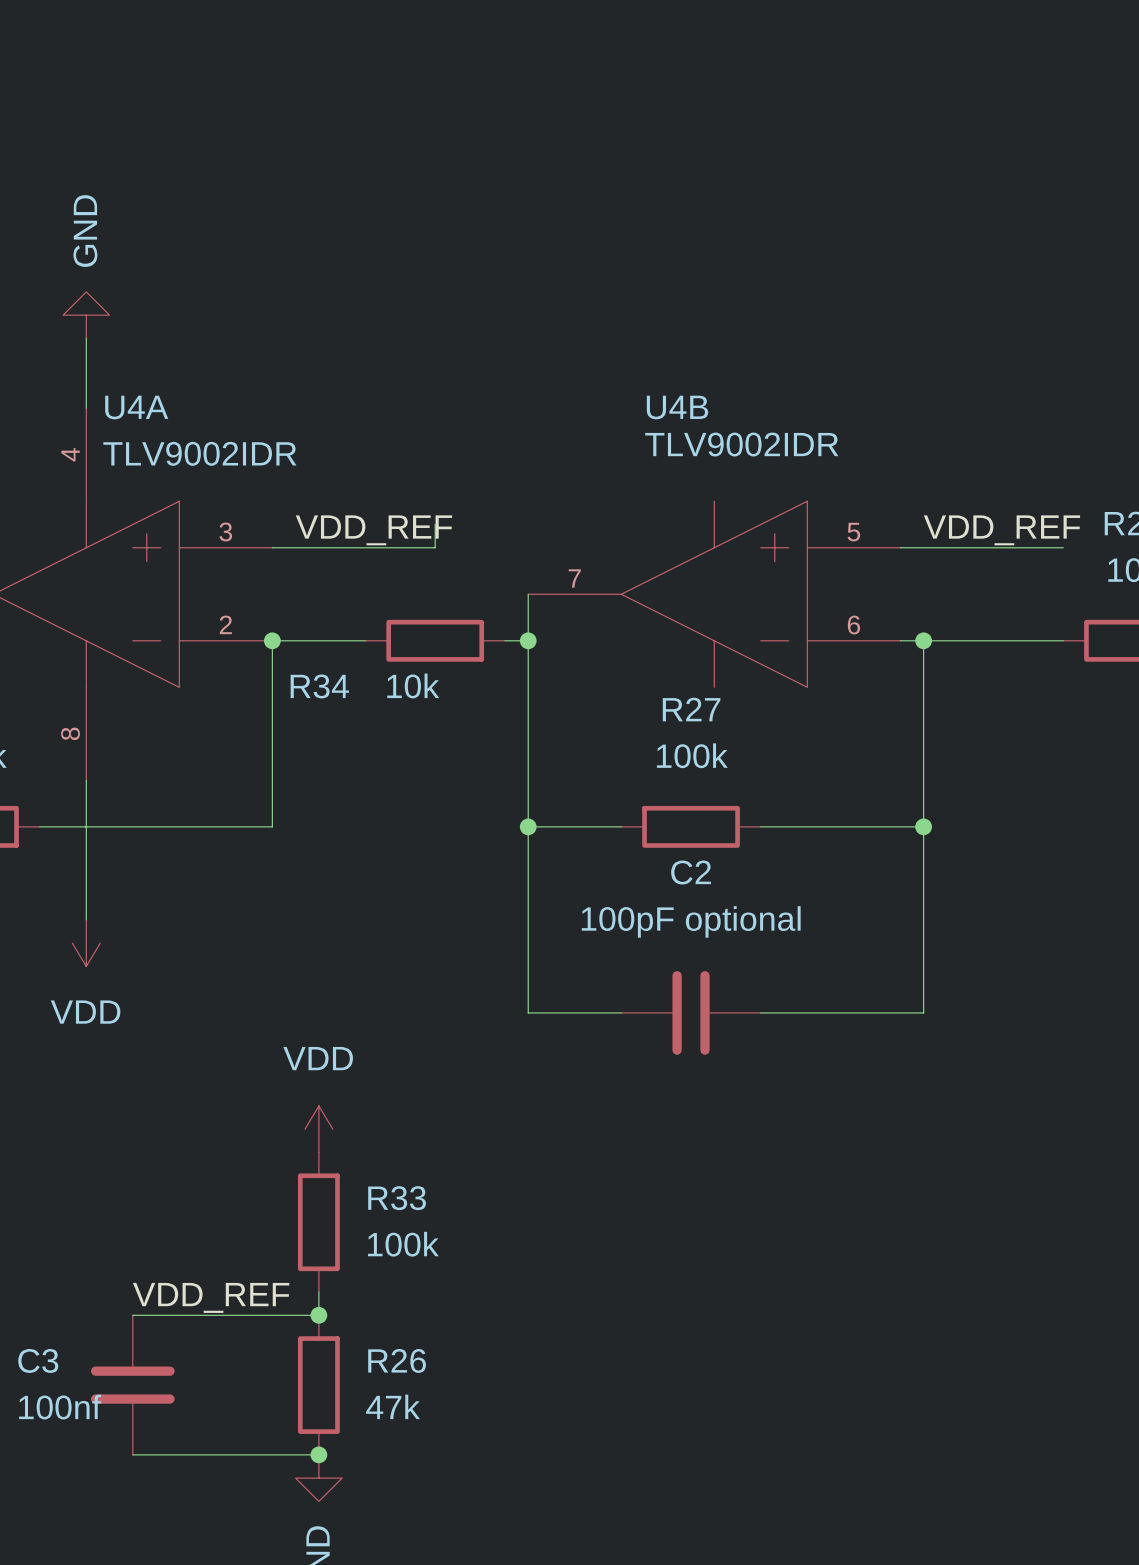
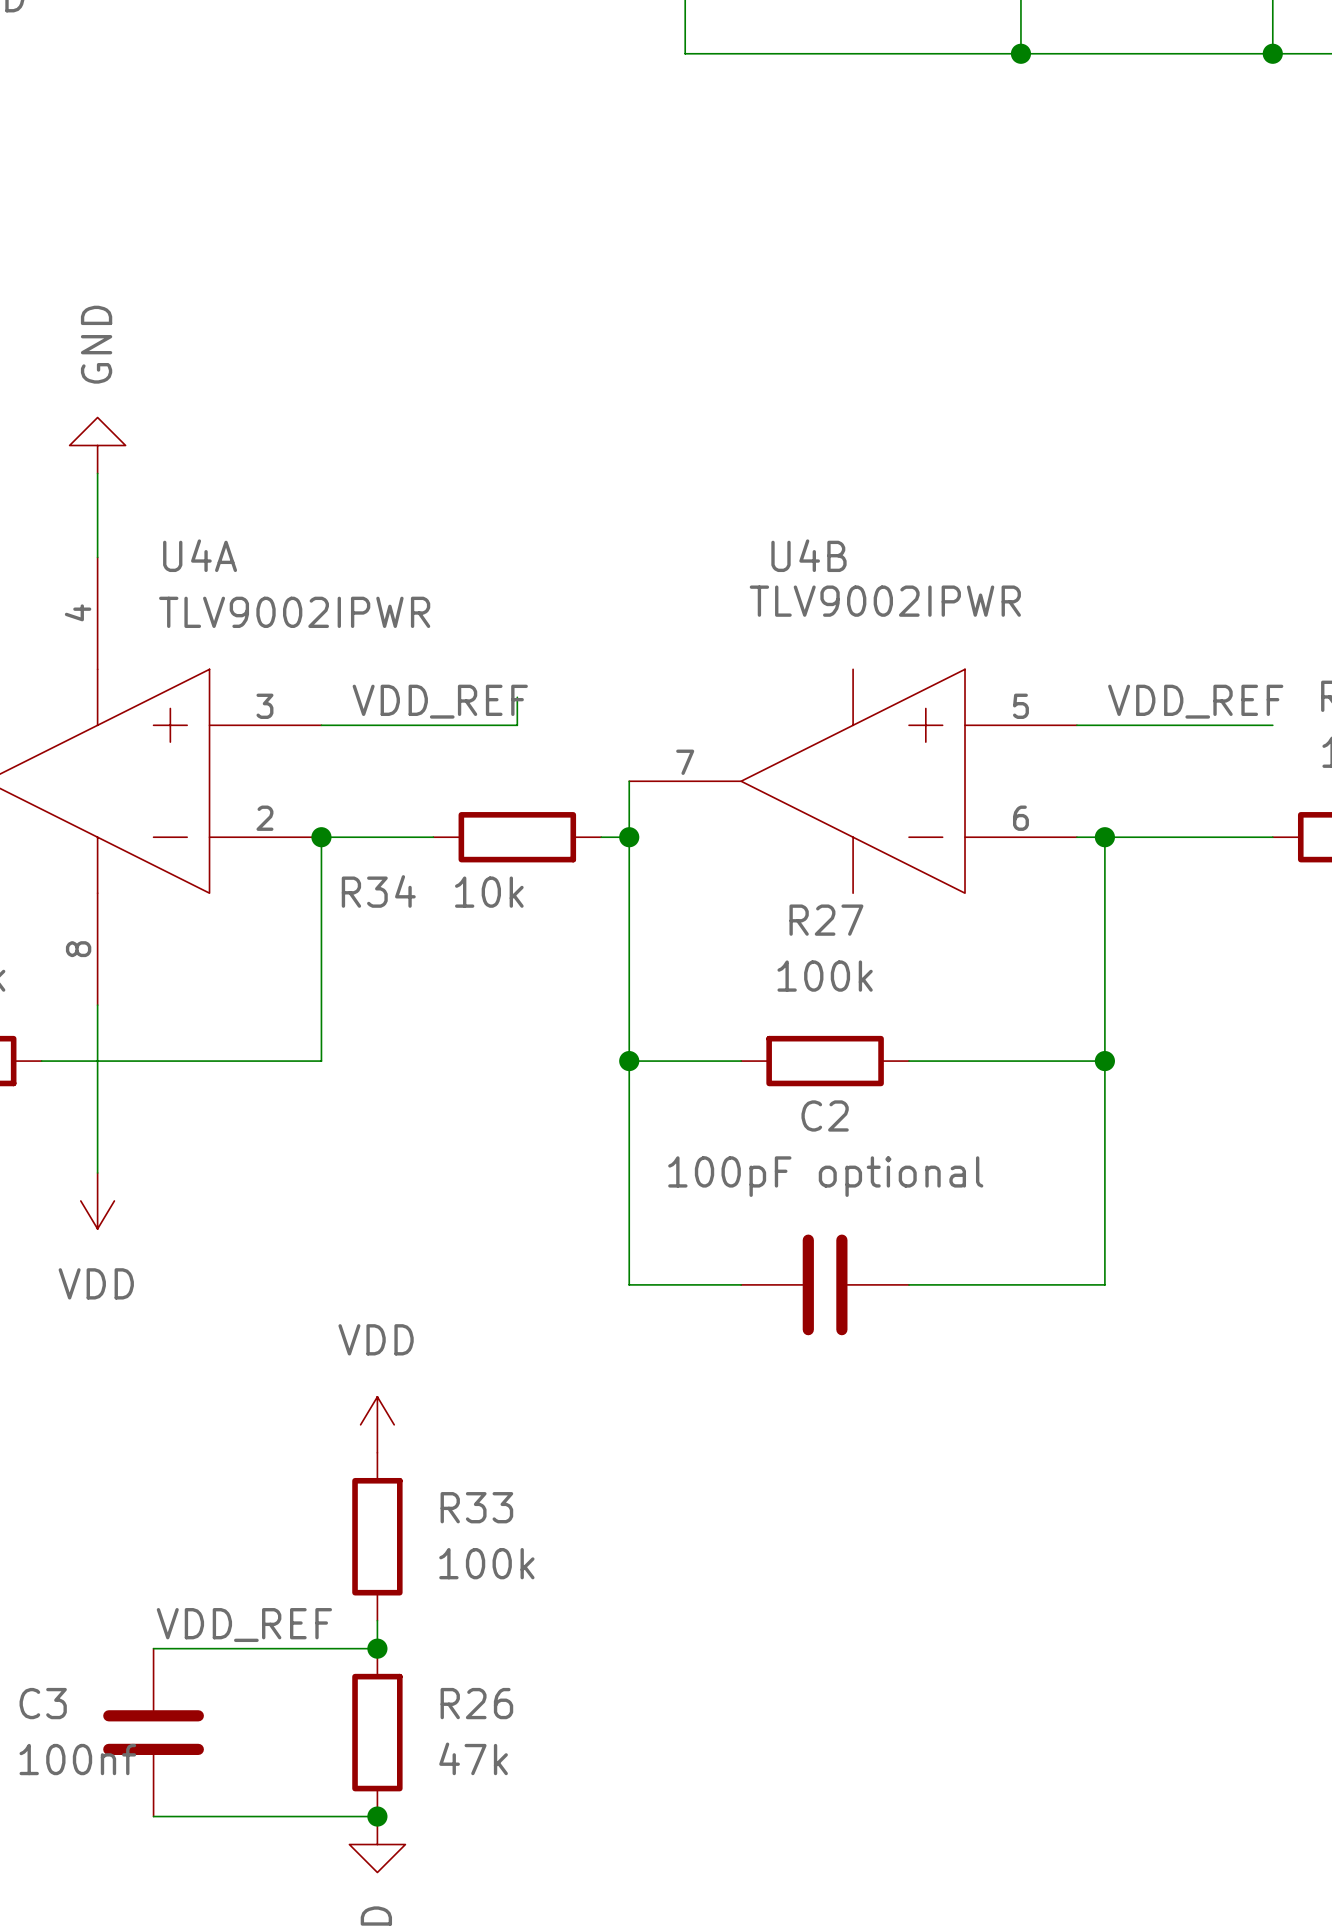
U4A name position: U4A (136, 407) -> U4A (200, 555)
U4B value: TLV9002IDR (741, 444) -> TLV9002IPWR (885, 601)
U4A value: TLV9002IDR (199, 453) -> TLV9002IPWR (294, 612)

